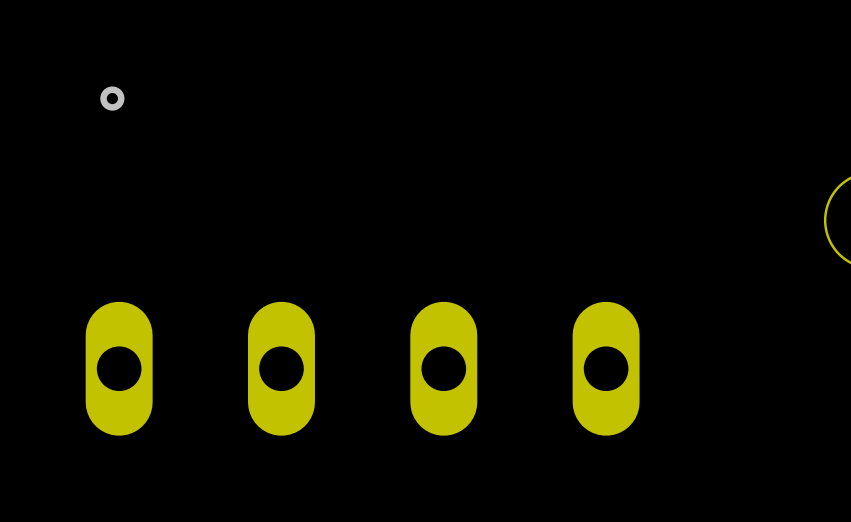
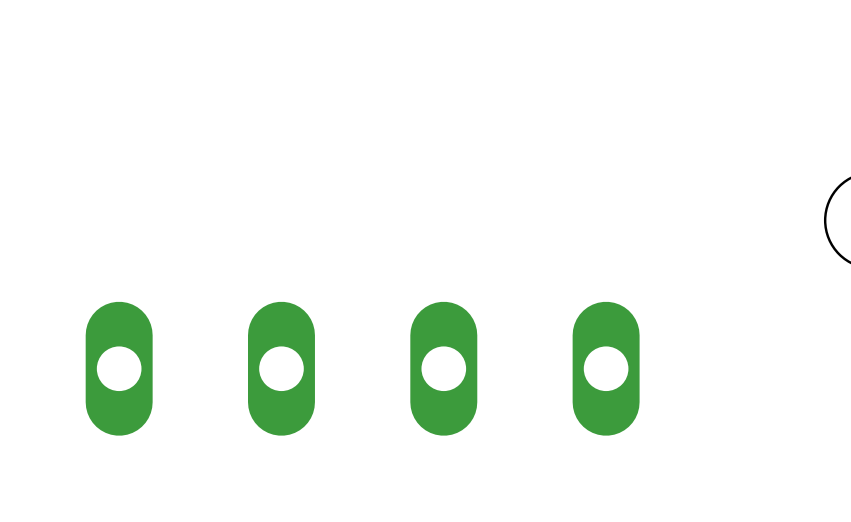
via: (112, 98) -> none

